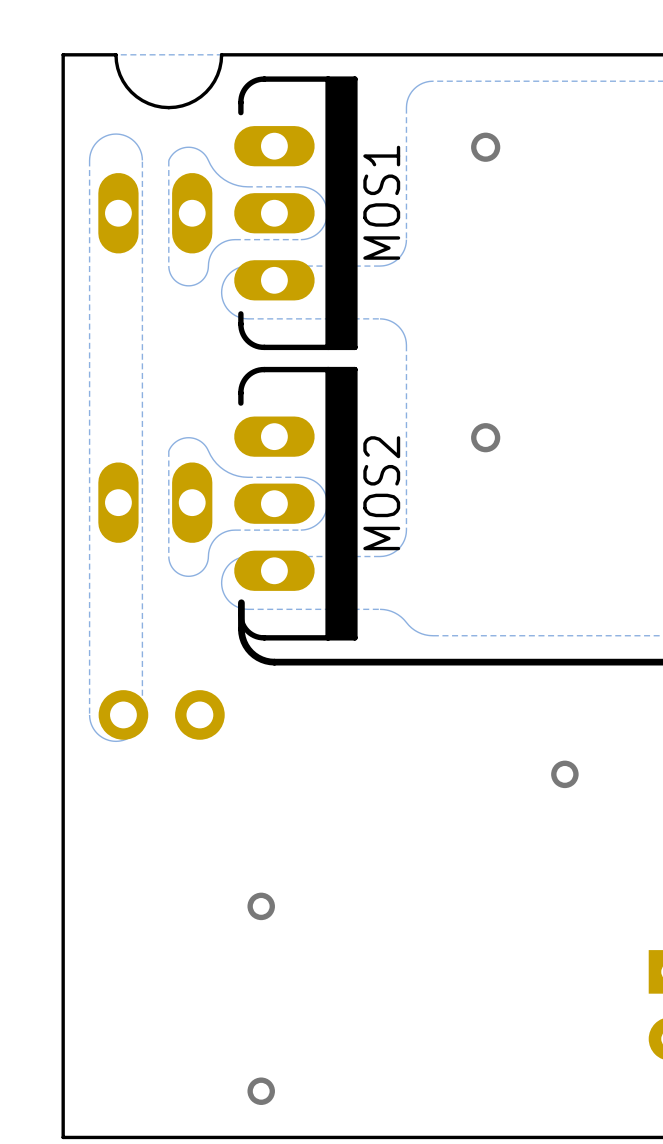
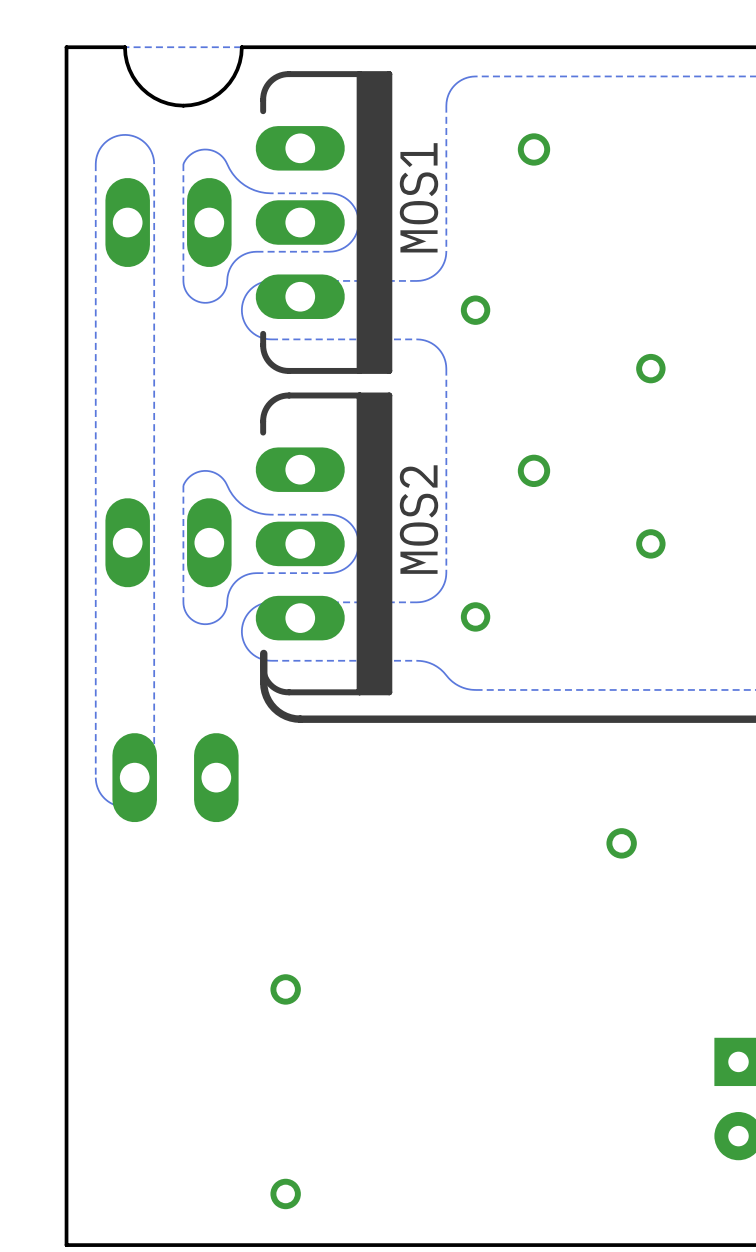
via: none -> (475, 310)
via: none -> (650, 368)
via: none -> (650, 543)
via: none -> (475, 616)
part footprint: [98, 690, 225, 740] -> [112, 733, 239, 823]

